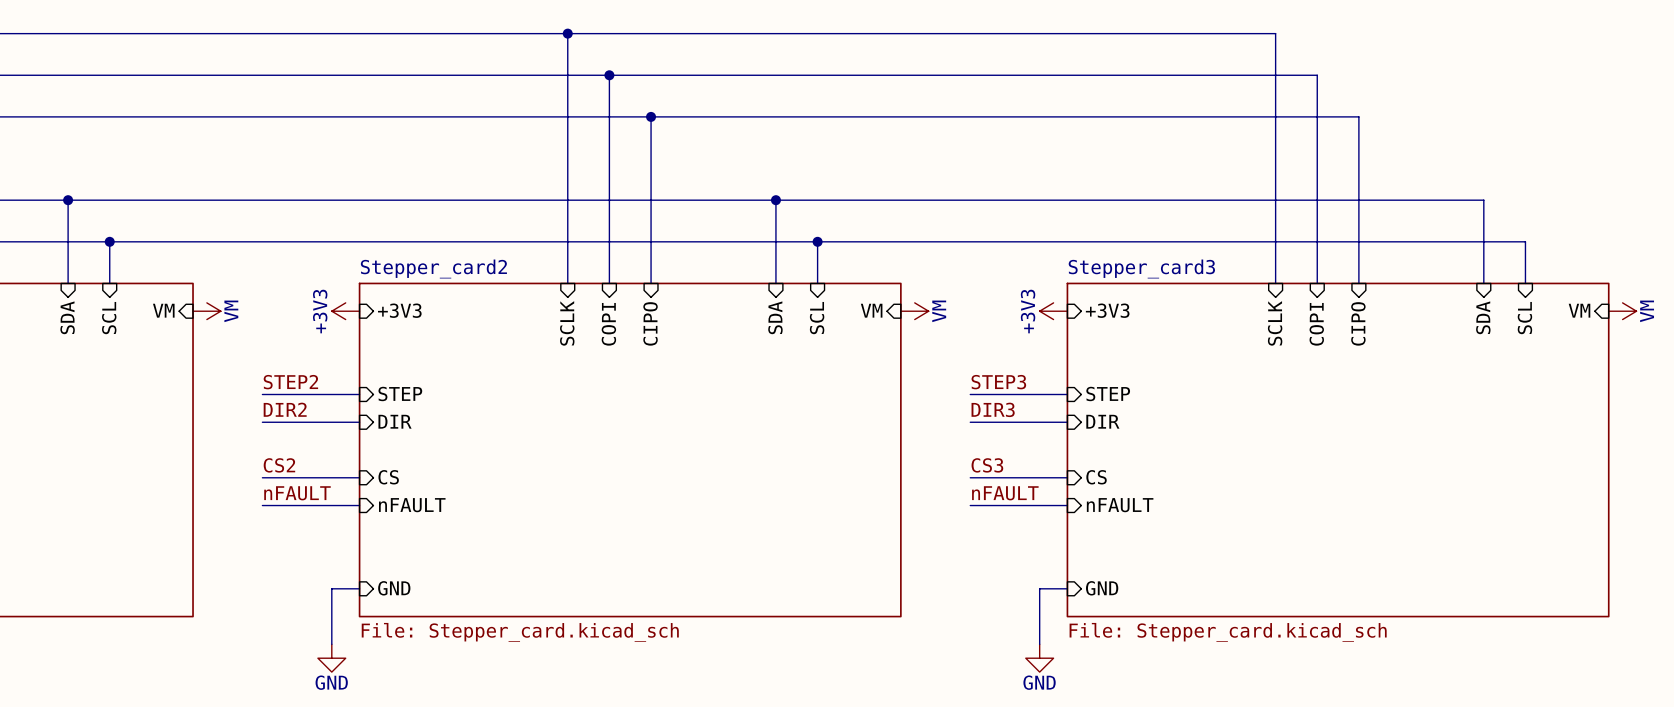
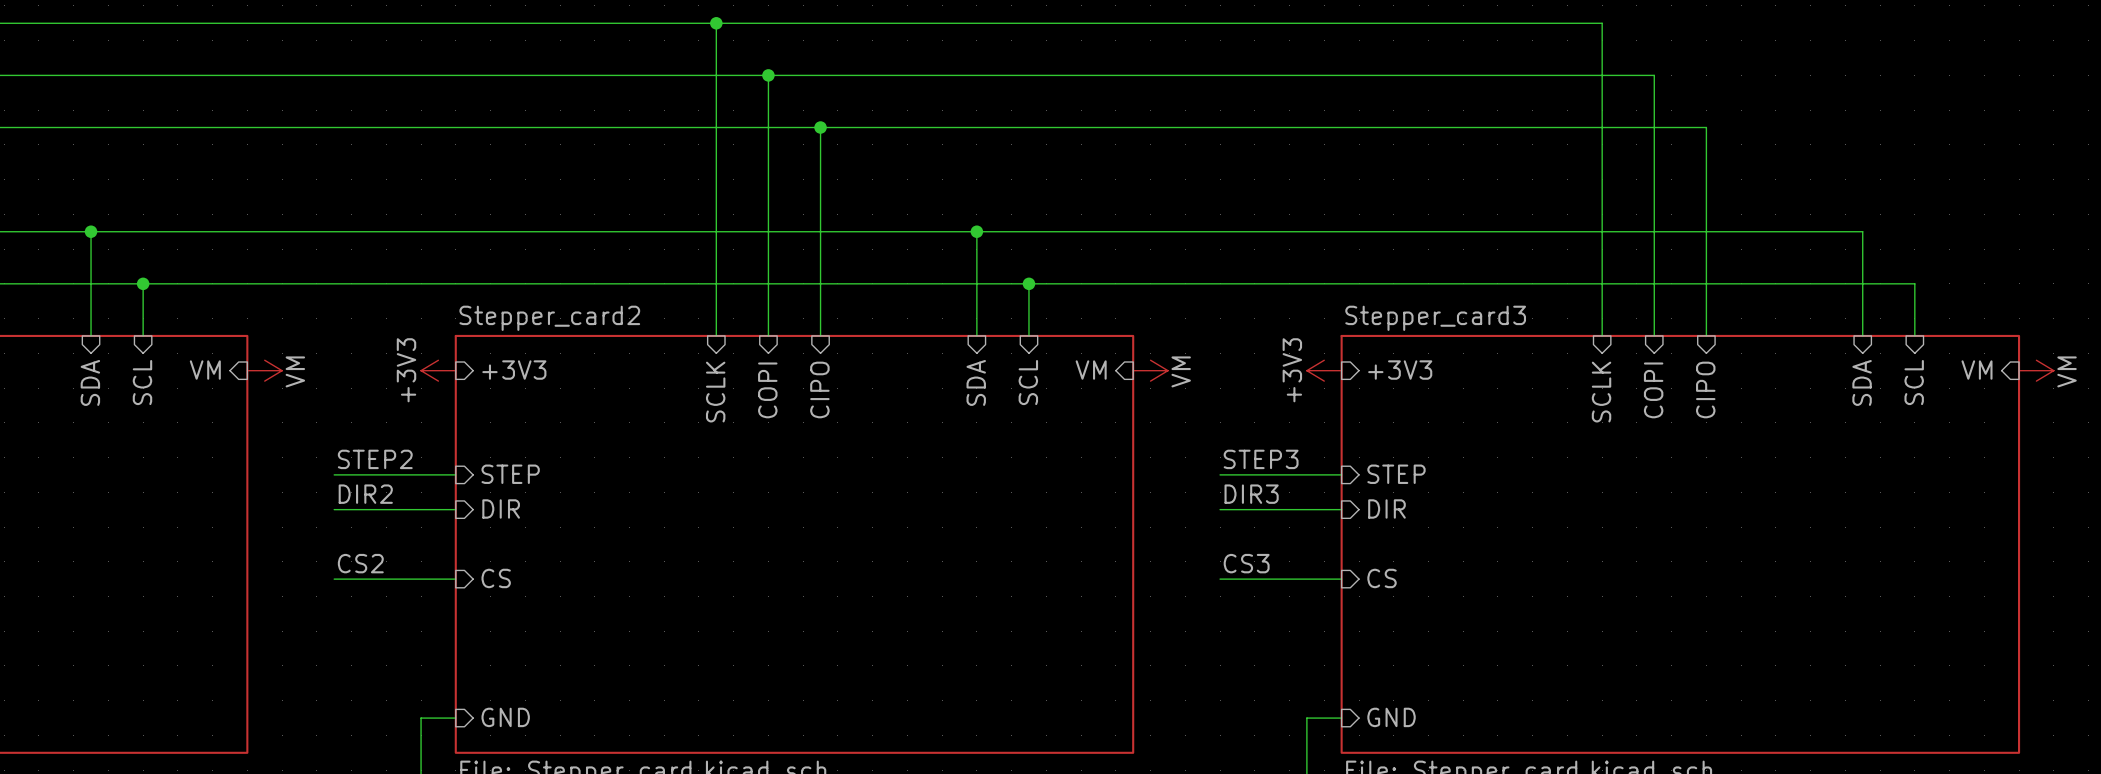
label: nFAULT (297, 493) -> none
label: nFAULT (1005, 493) -> none
wire: (262, 505) (359, 505) -> none
sheet pin: nFAULT (412, 505) -> none
wire: (970, 505) (1067, 505) -> none
sheet pin: nFAULT (1120, 505) -> none

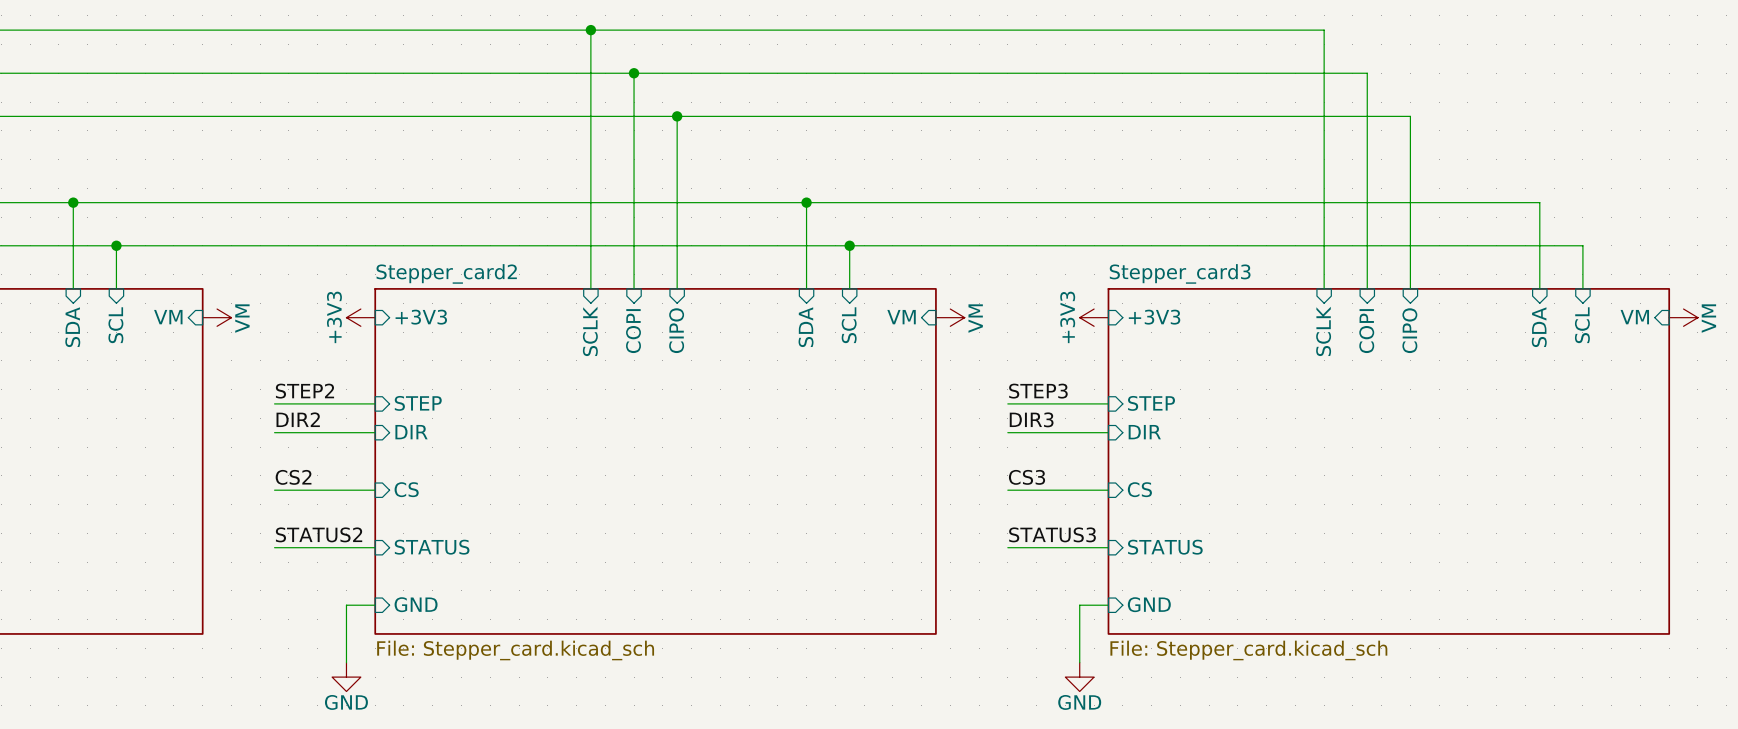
label: none -> STATUS2 (319, 534)
label: none -> STATUS3 (1052, 534)
sheet pin: none -> STATUS (432, 547)
sheet pin: none -> STATUS (1165, 547)
wire: none -> (274, 547) (375, 547)
wire: none -> (1007, 547) (1108, 547)

